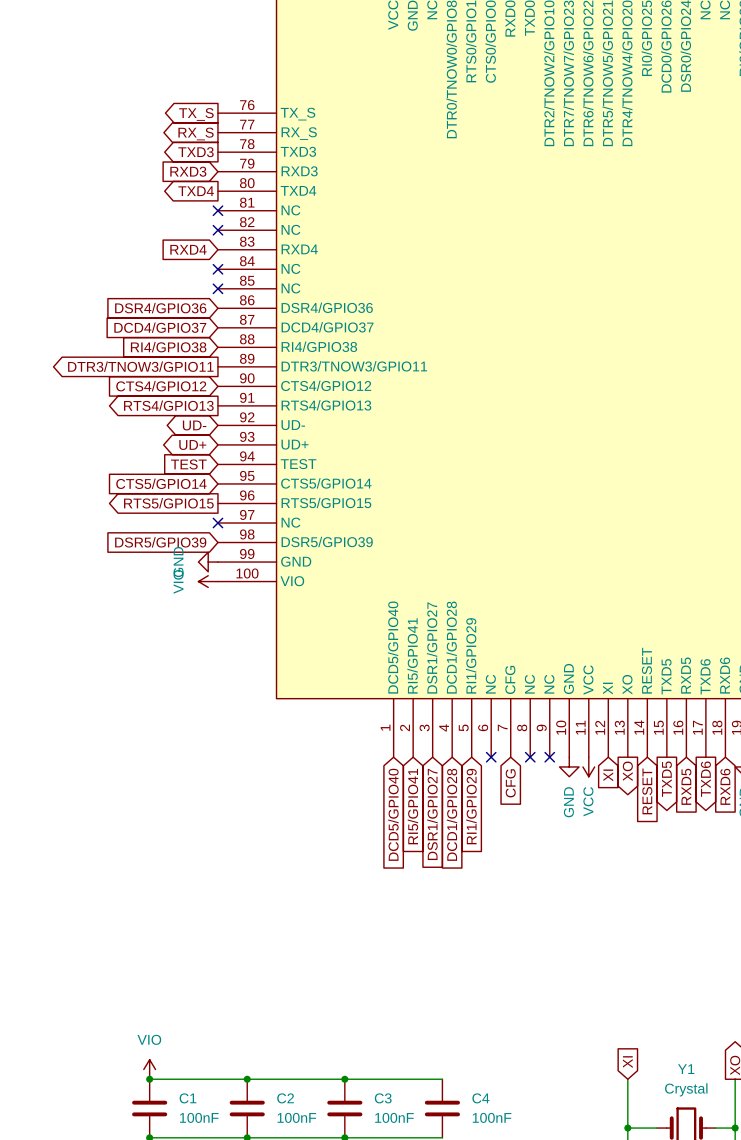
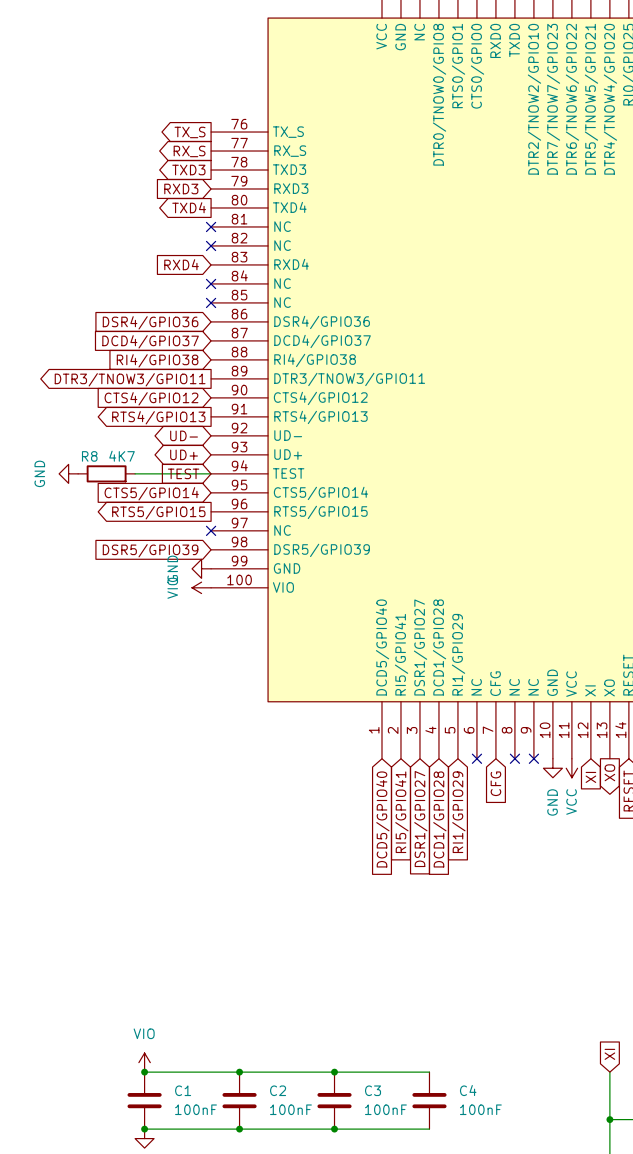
power symbol: none -> GND (68, 473)
R8: none -> 4K7 (106, 473)
wire: none -> (135, 473) (211, 473)

